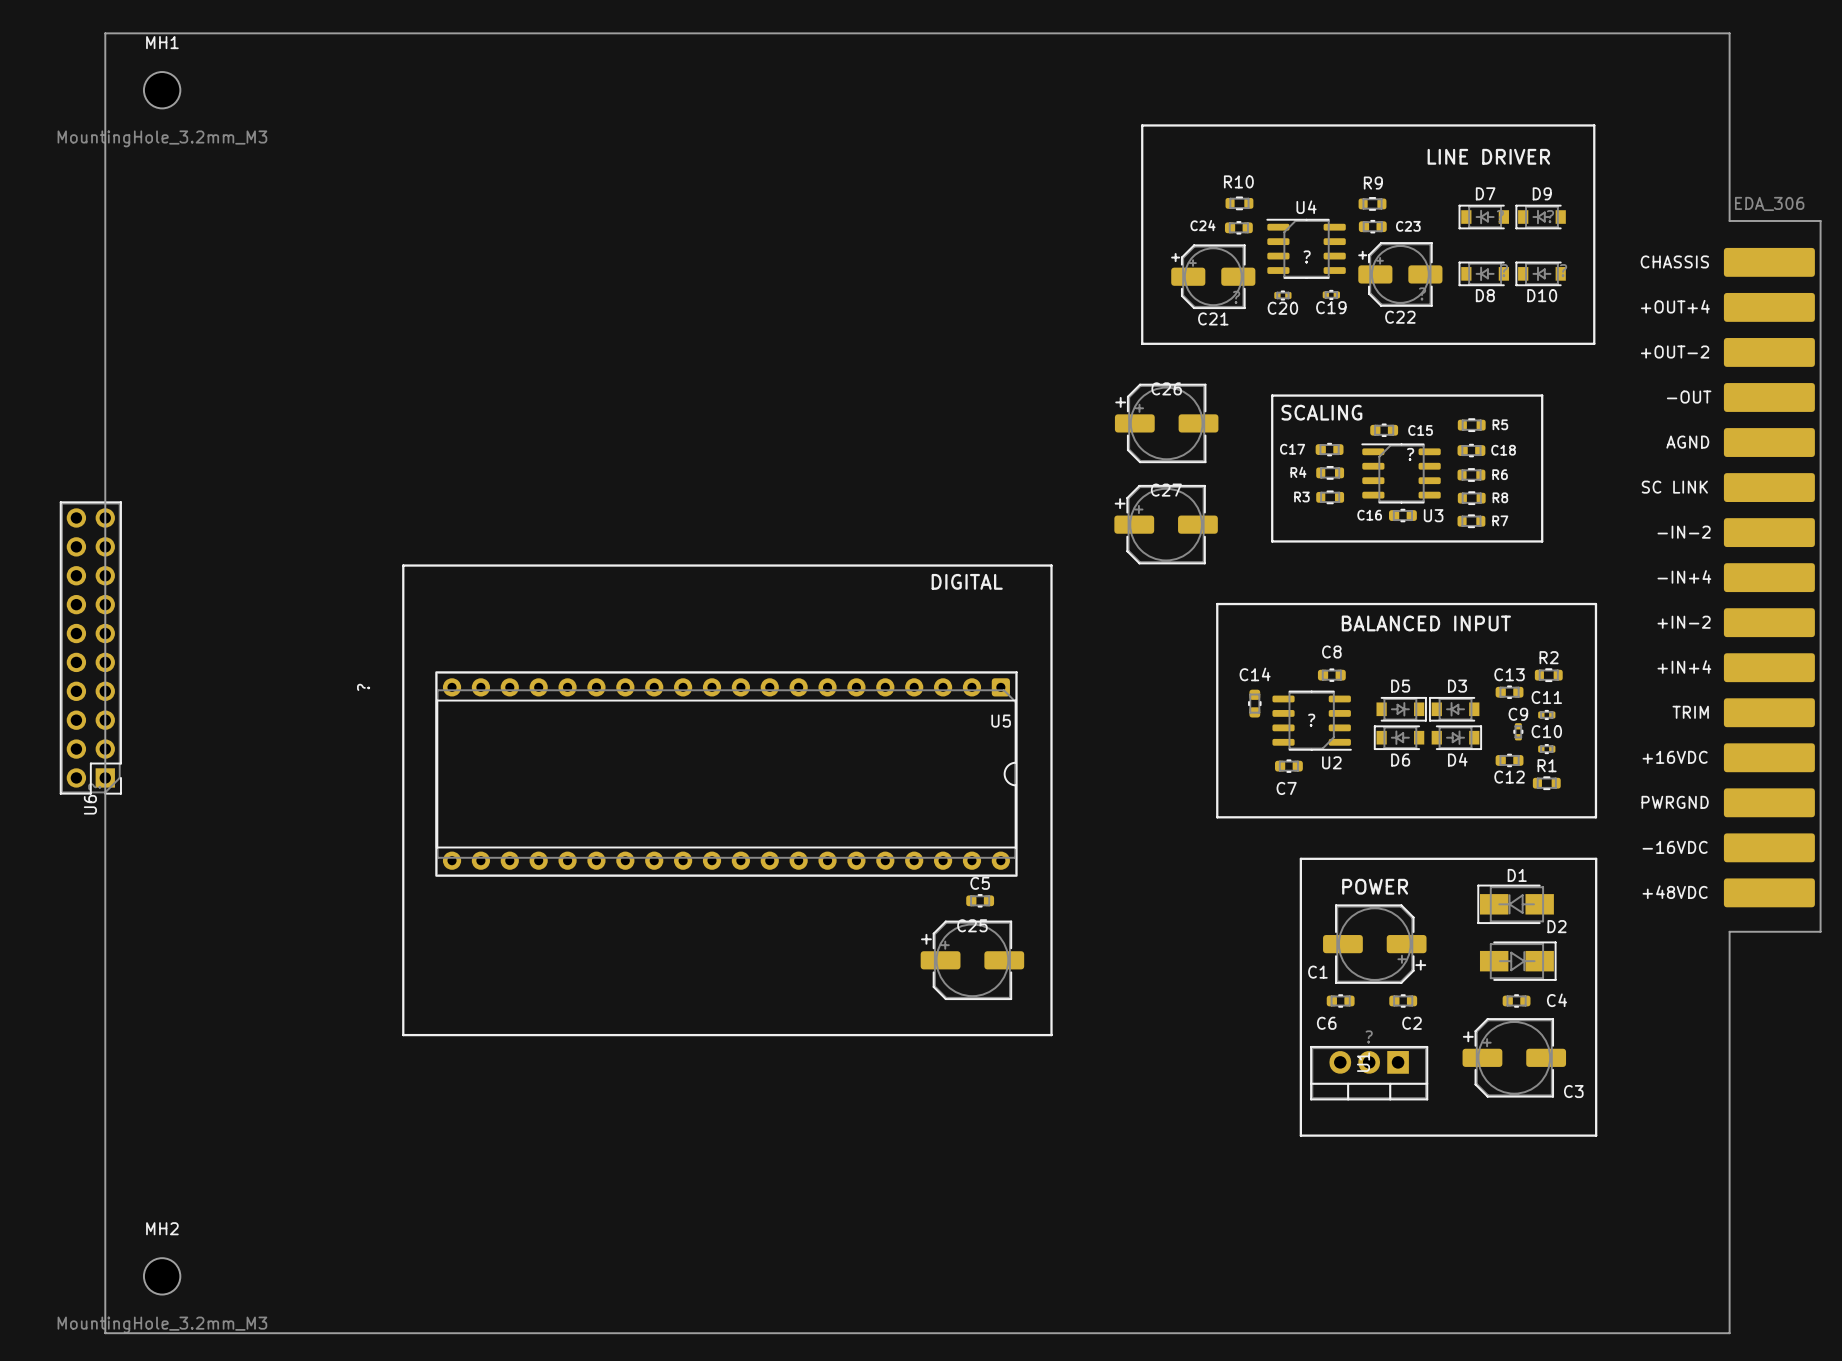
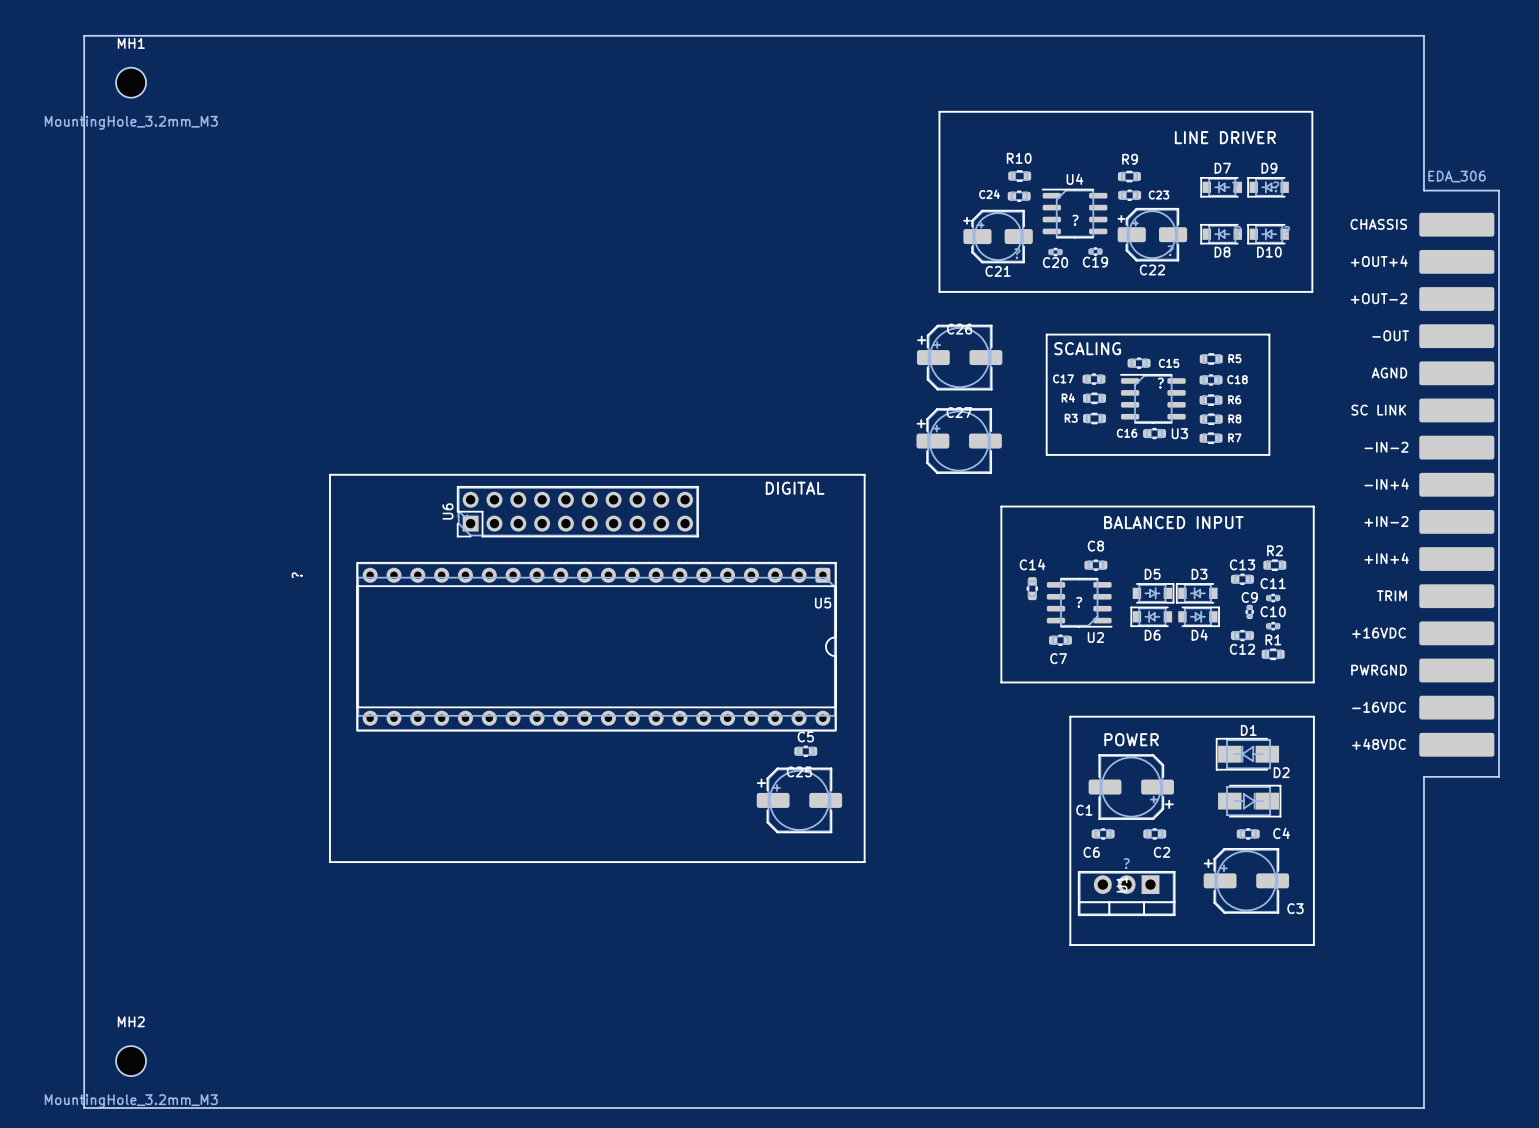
U6 rotation: 0° (90, 647) -> 90° clockwise (577, 511)
U6 position: (90, 647) -> (577, 511)

